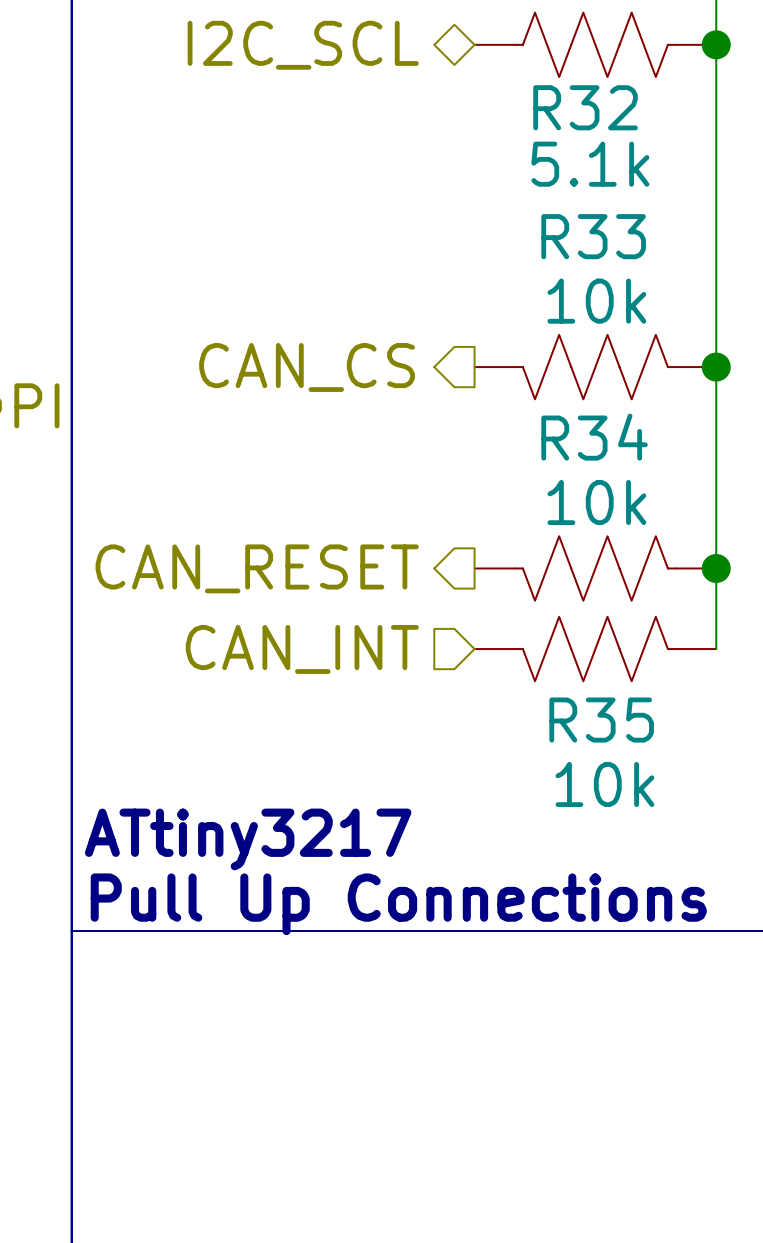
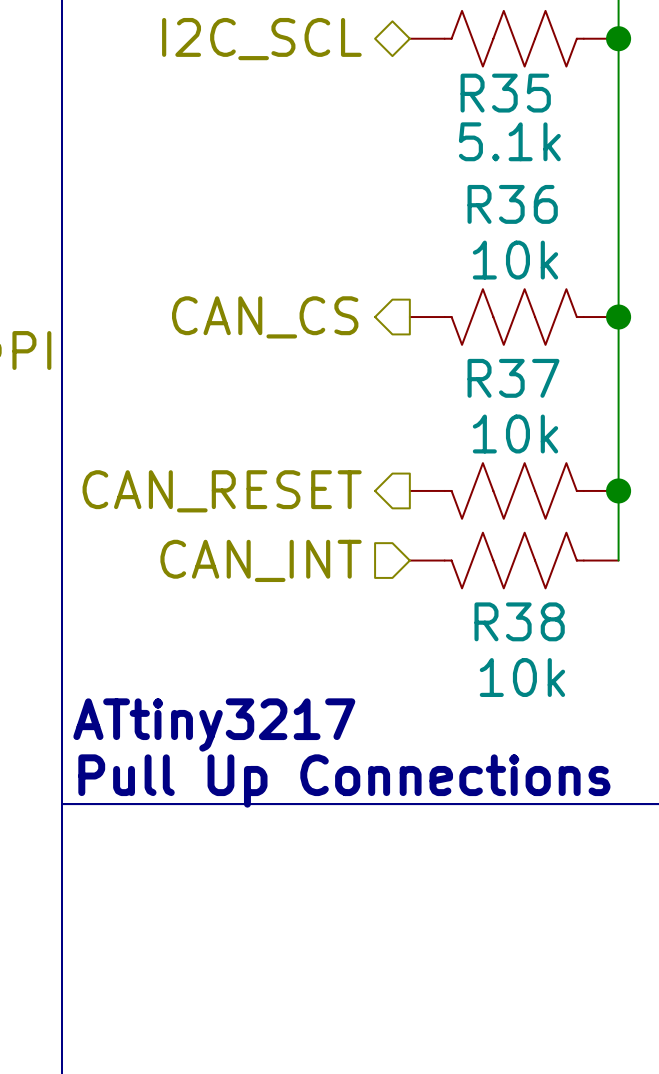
R32 name: R32 (585, 107) -> R35 (505, 93)
R33 name: R33 (593, 236) -> R36 (512, 204)
R34 name: R34 (594, 437) -> R37 (513, 378)
R35 name: R35 (601, 720) -> R38 (519, 621)

